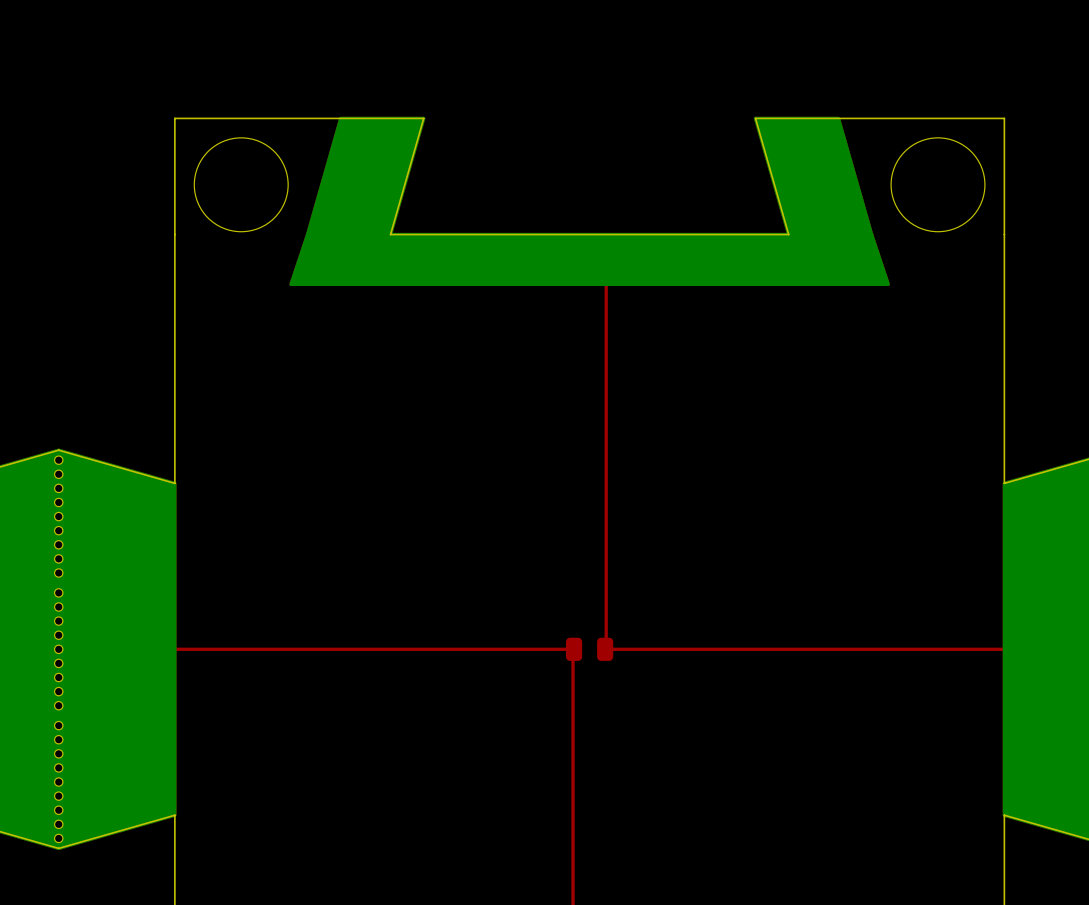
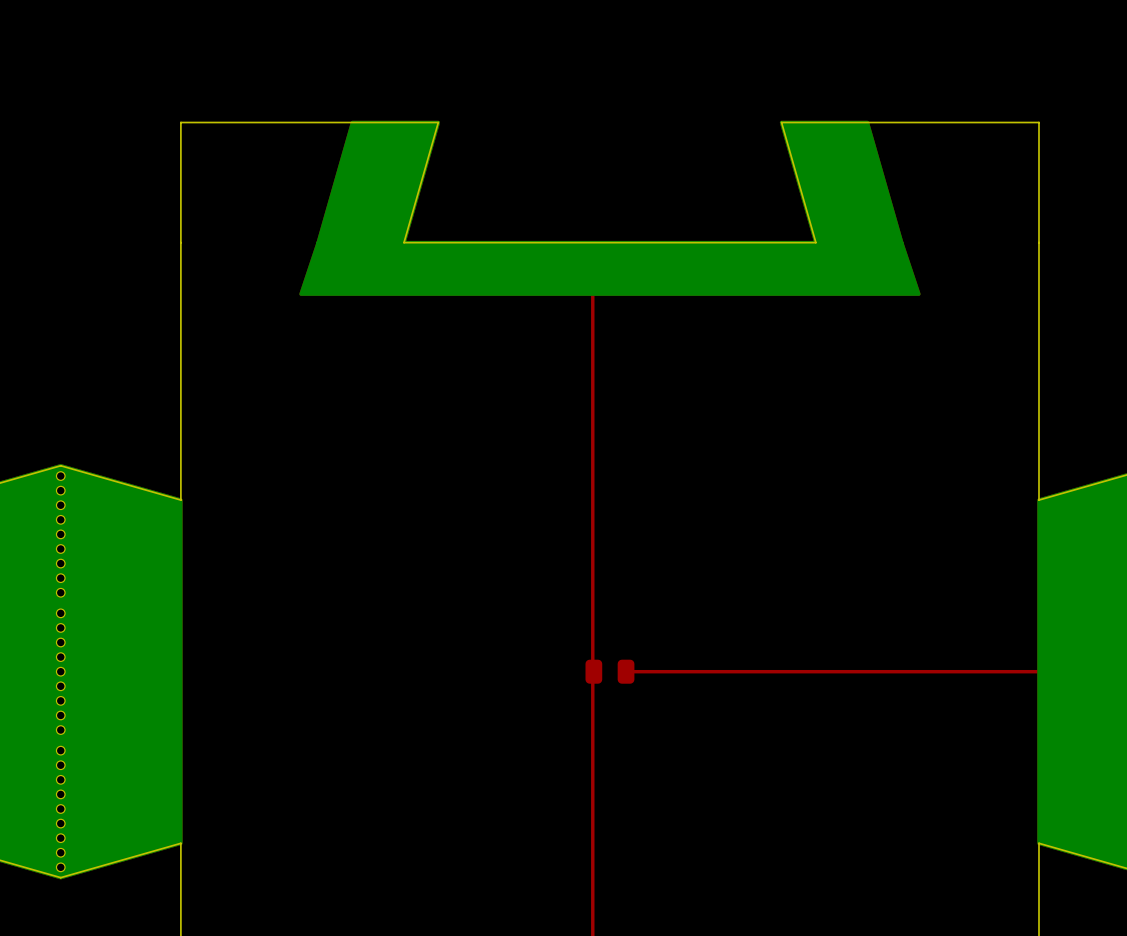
round board edge: [193, 137, 289, 233] -> none
round board edge: [890, 137, 986, 233] -> none
top track: (606, 267) (606, 649) -> (592, 276) (592, 671)
top track: (108, 649) (573, 649) (573, 657) -> none

